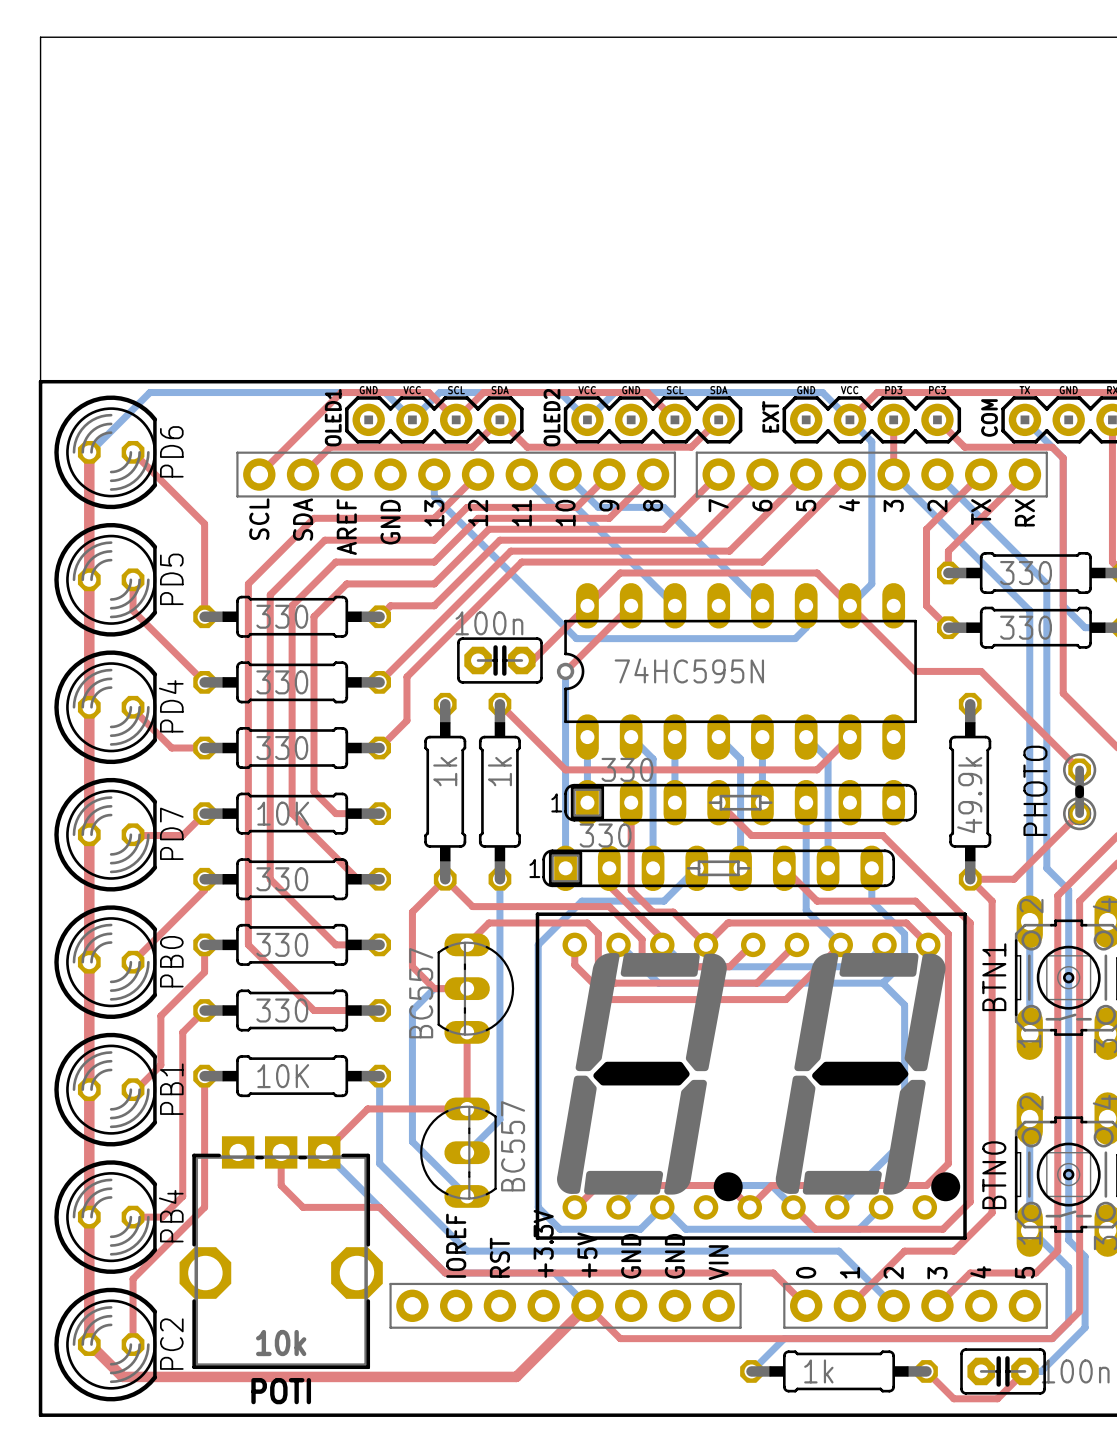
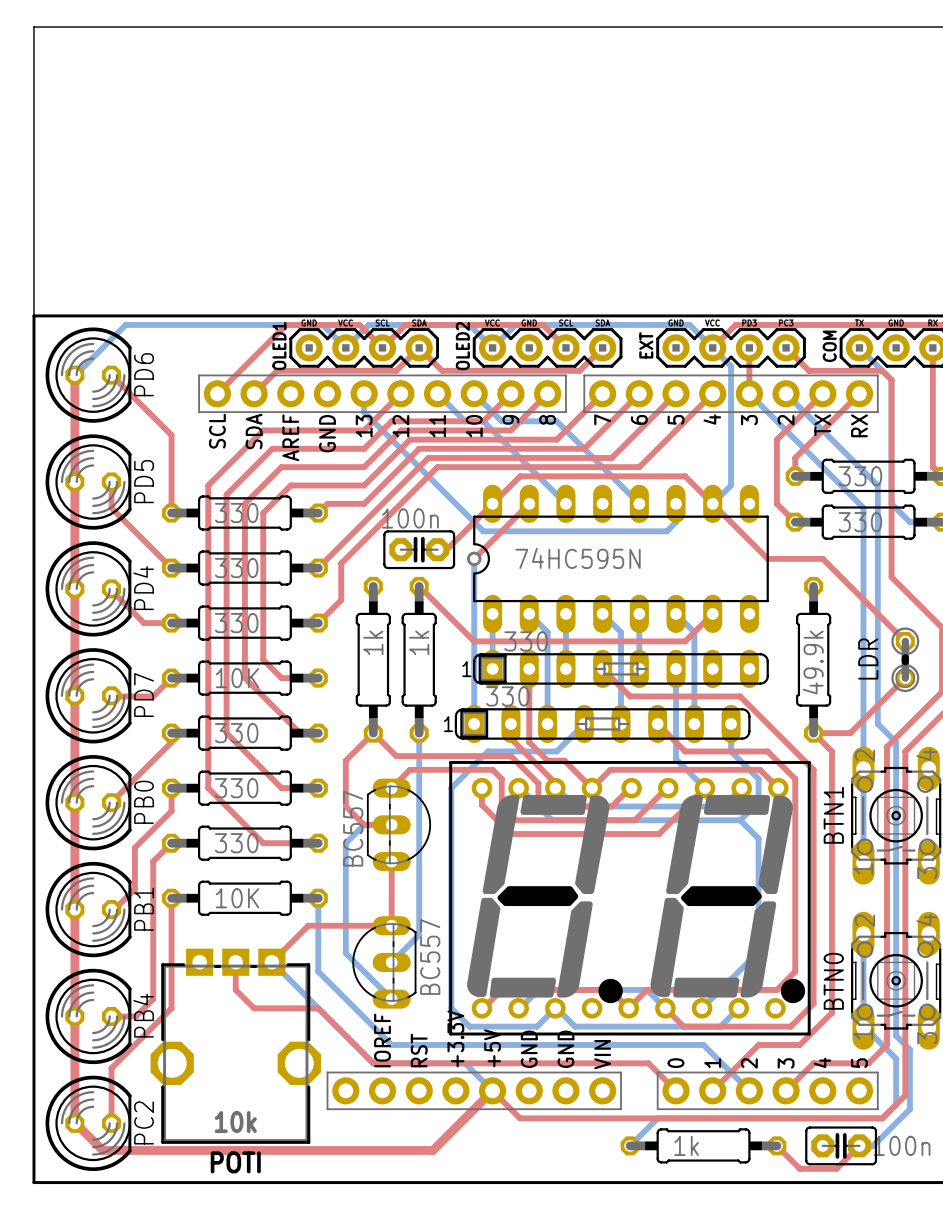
PHOTO name: PHOTO (1035, 790) -> LDR (868, 658)

